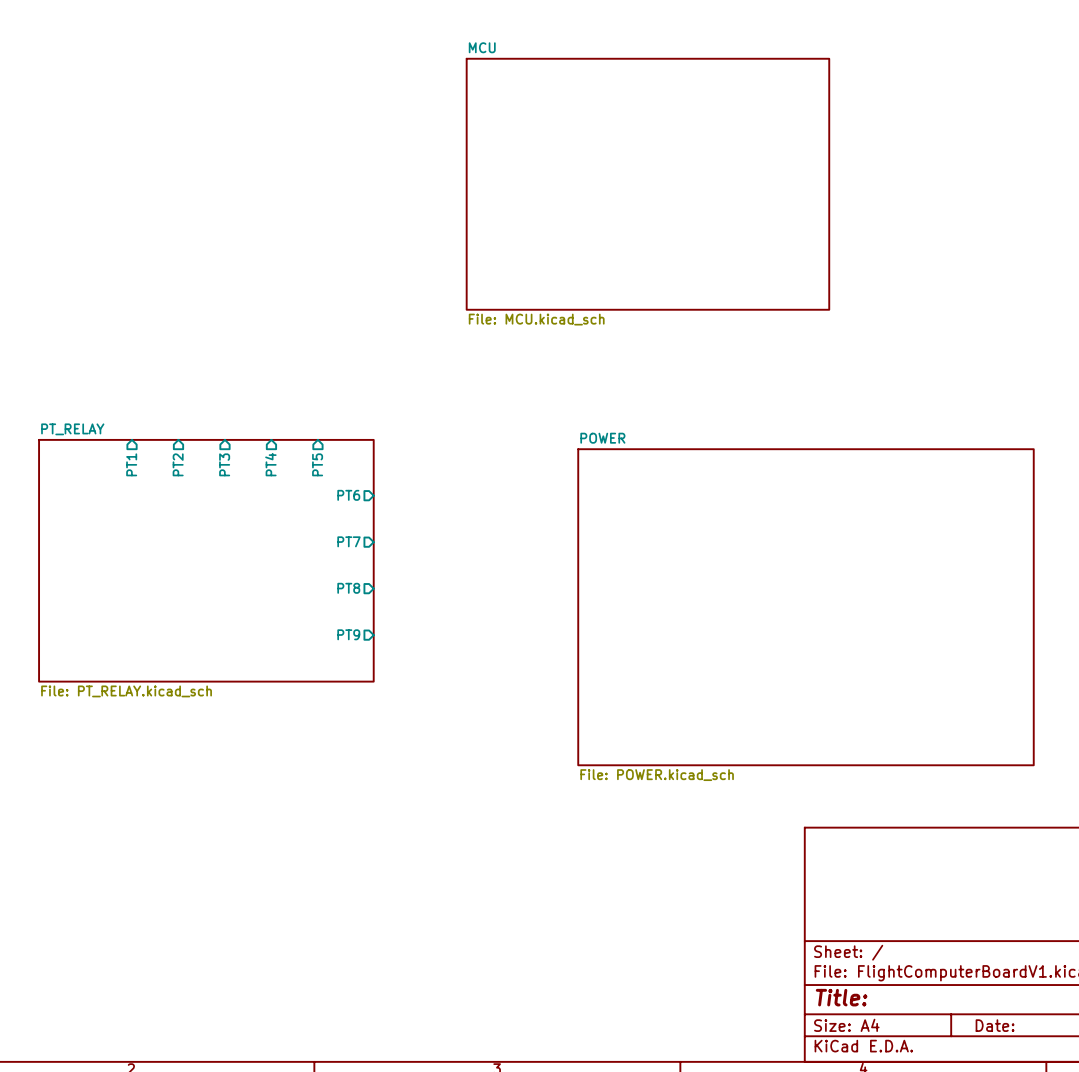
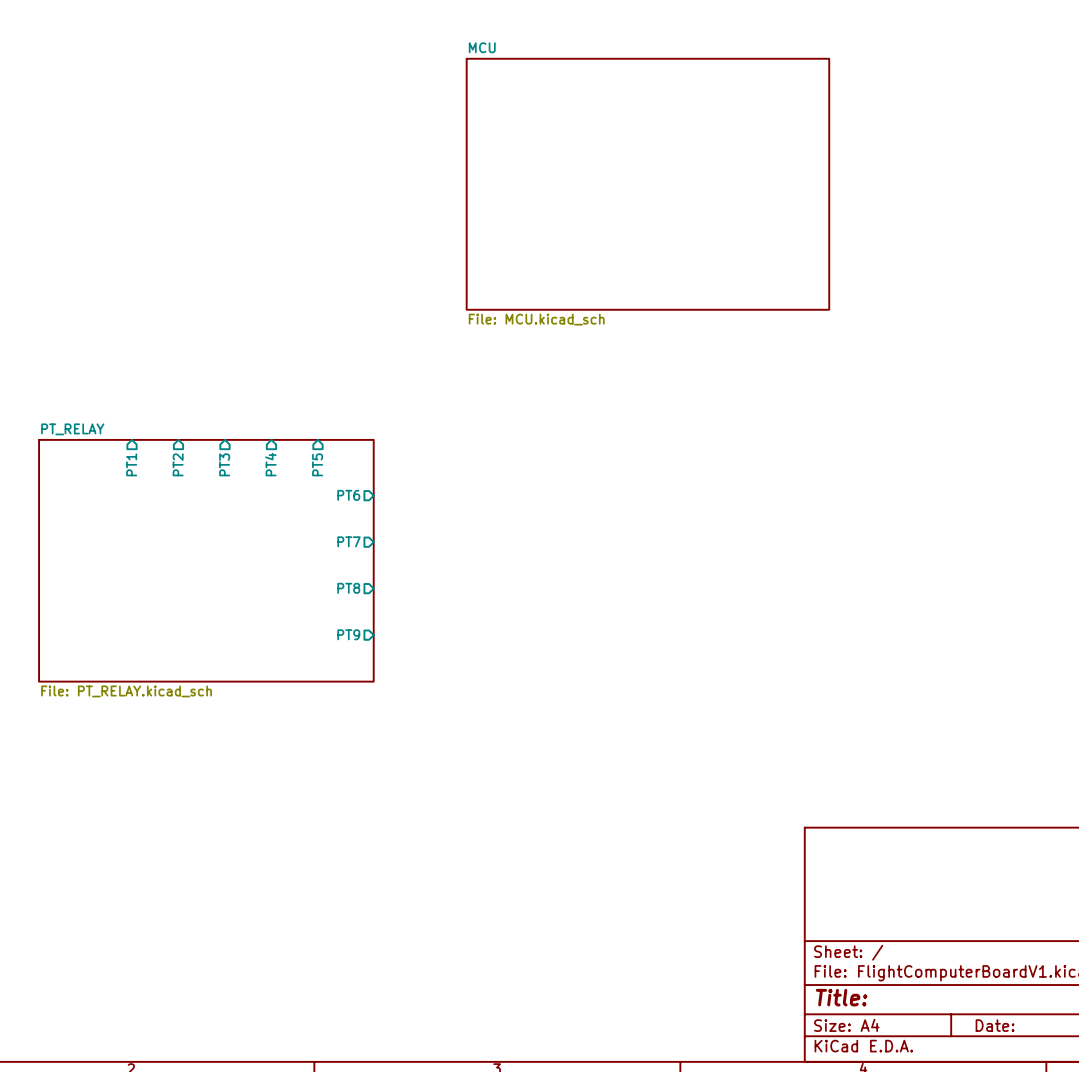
sheet POWER: File: POWER.kicad_sch (805, 607) -> none

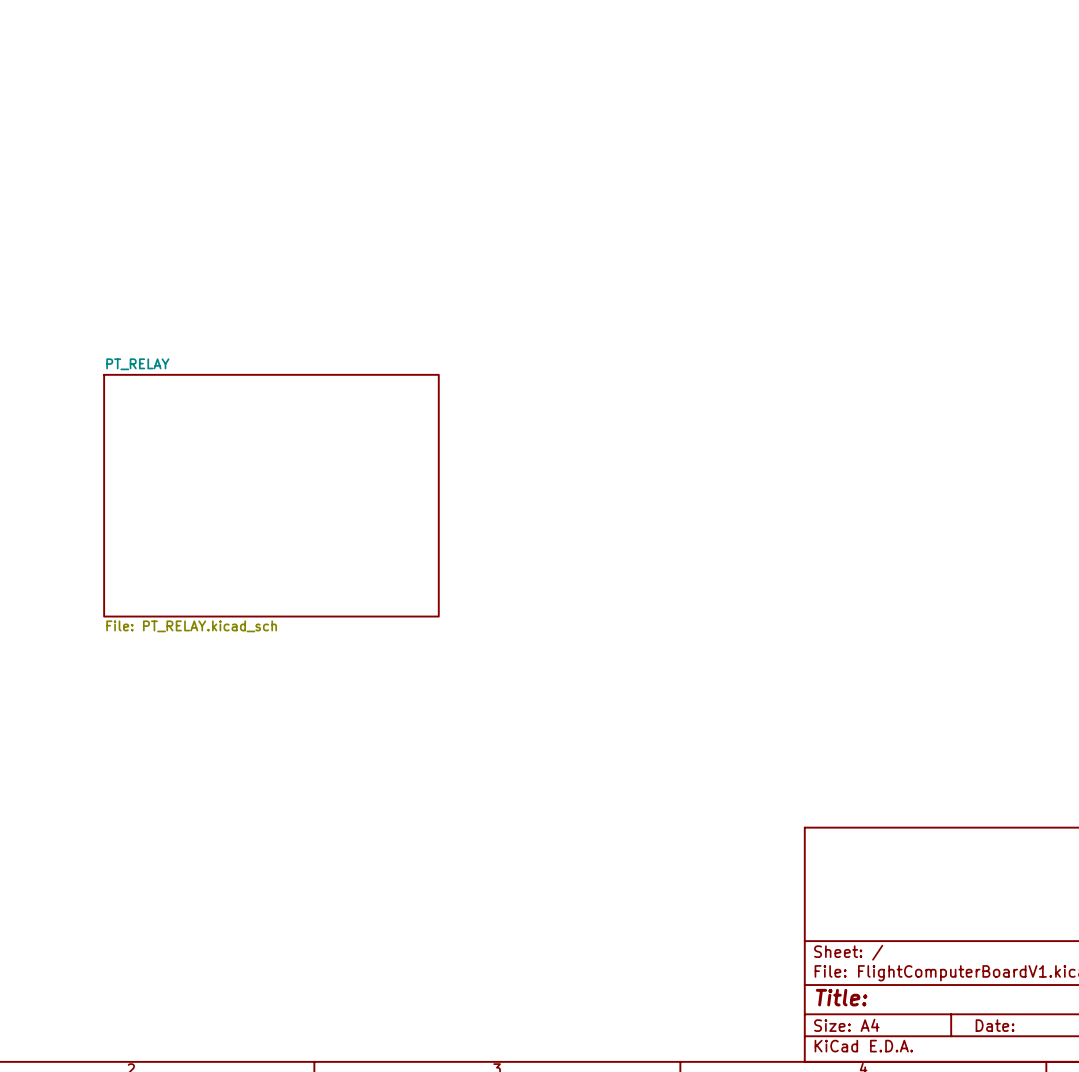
sheet MCU: File: MCU.kicad_sch (647, 184) -> none
sheet pin: PT1 (131, 464) -> none
sheet pin: PT2 (178, 464) -> none
sheet pin: PT3 (224, 464) -> none
sheet pin: PT4 (270, 464) -> none
sheet pin: PT5 (317, 464) -> none
sheet pin: PT6 (348, 495) -> none
sheet pin: PT7 (349, 541) -> none
sheet PT_RELAY position: (206, 560) -> (271, 495)
sheet pin: PT8 (348, 588) -> none
sheet pin: PT9 (348, 634) -> none

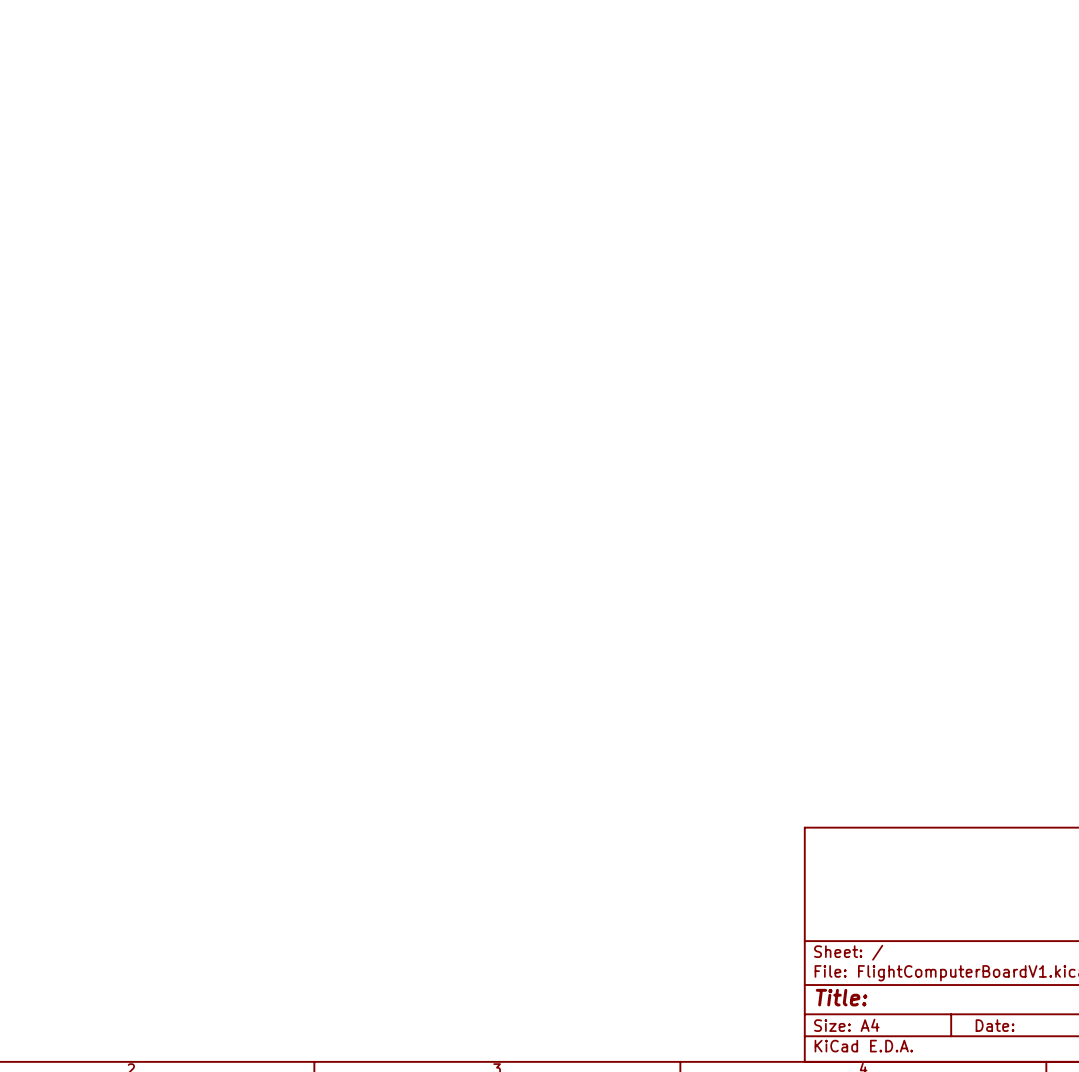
sheet PT_RELAY: File: PT_RELAY.kicad_sch (271, 495) -> none

